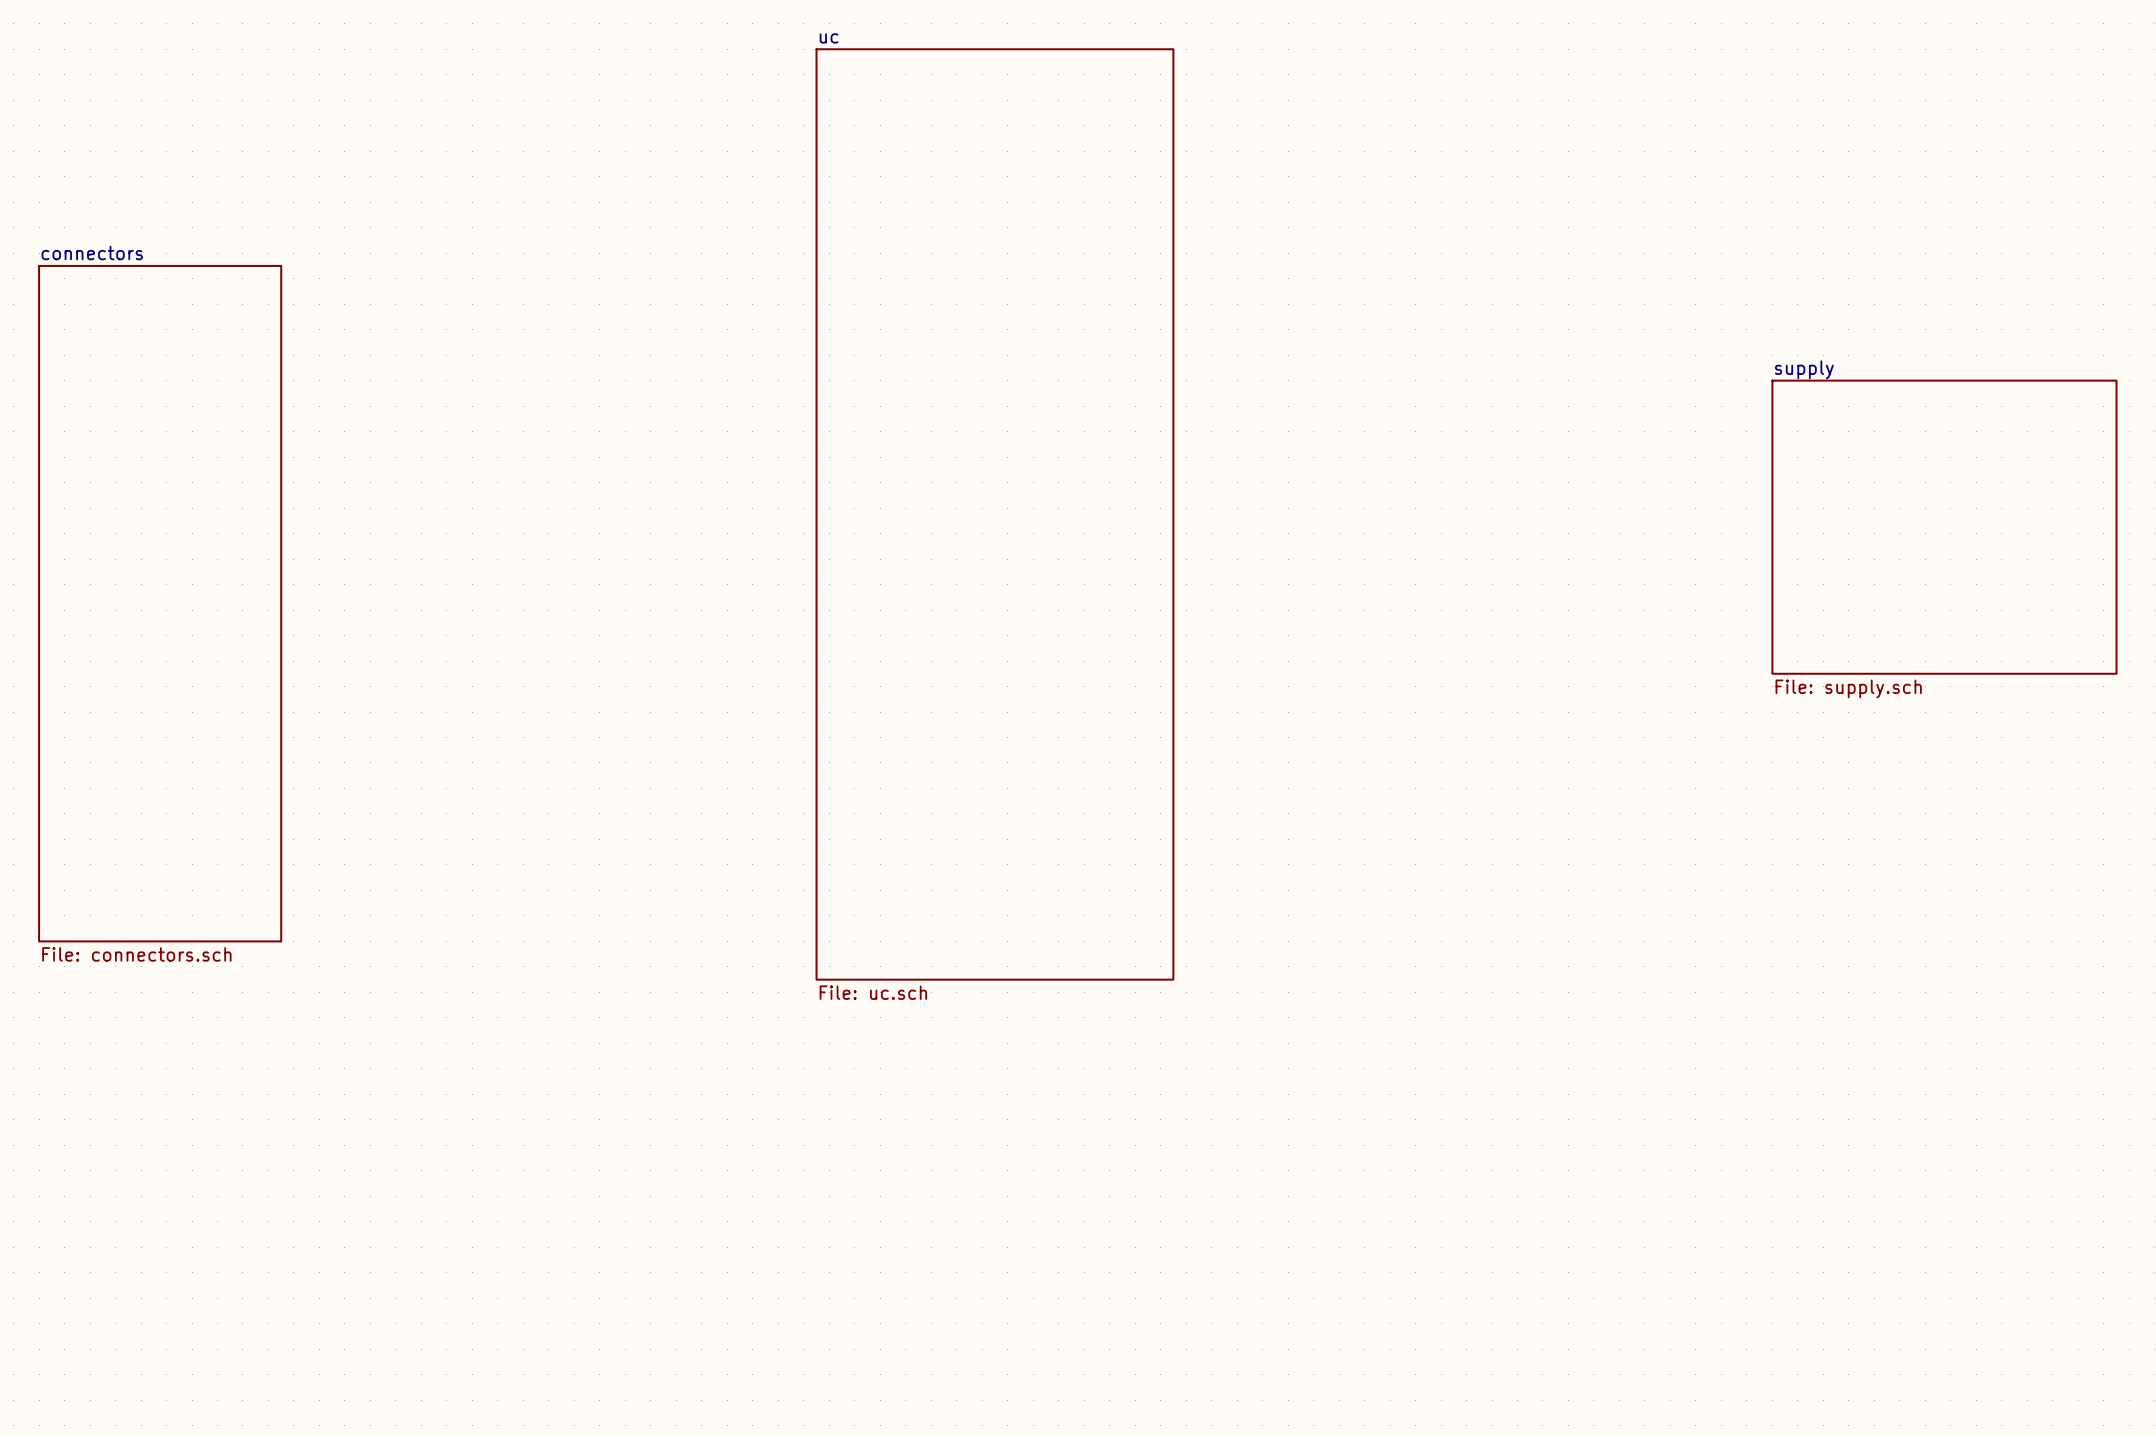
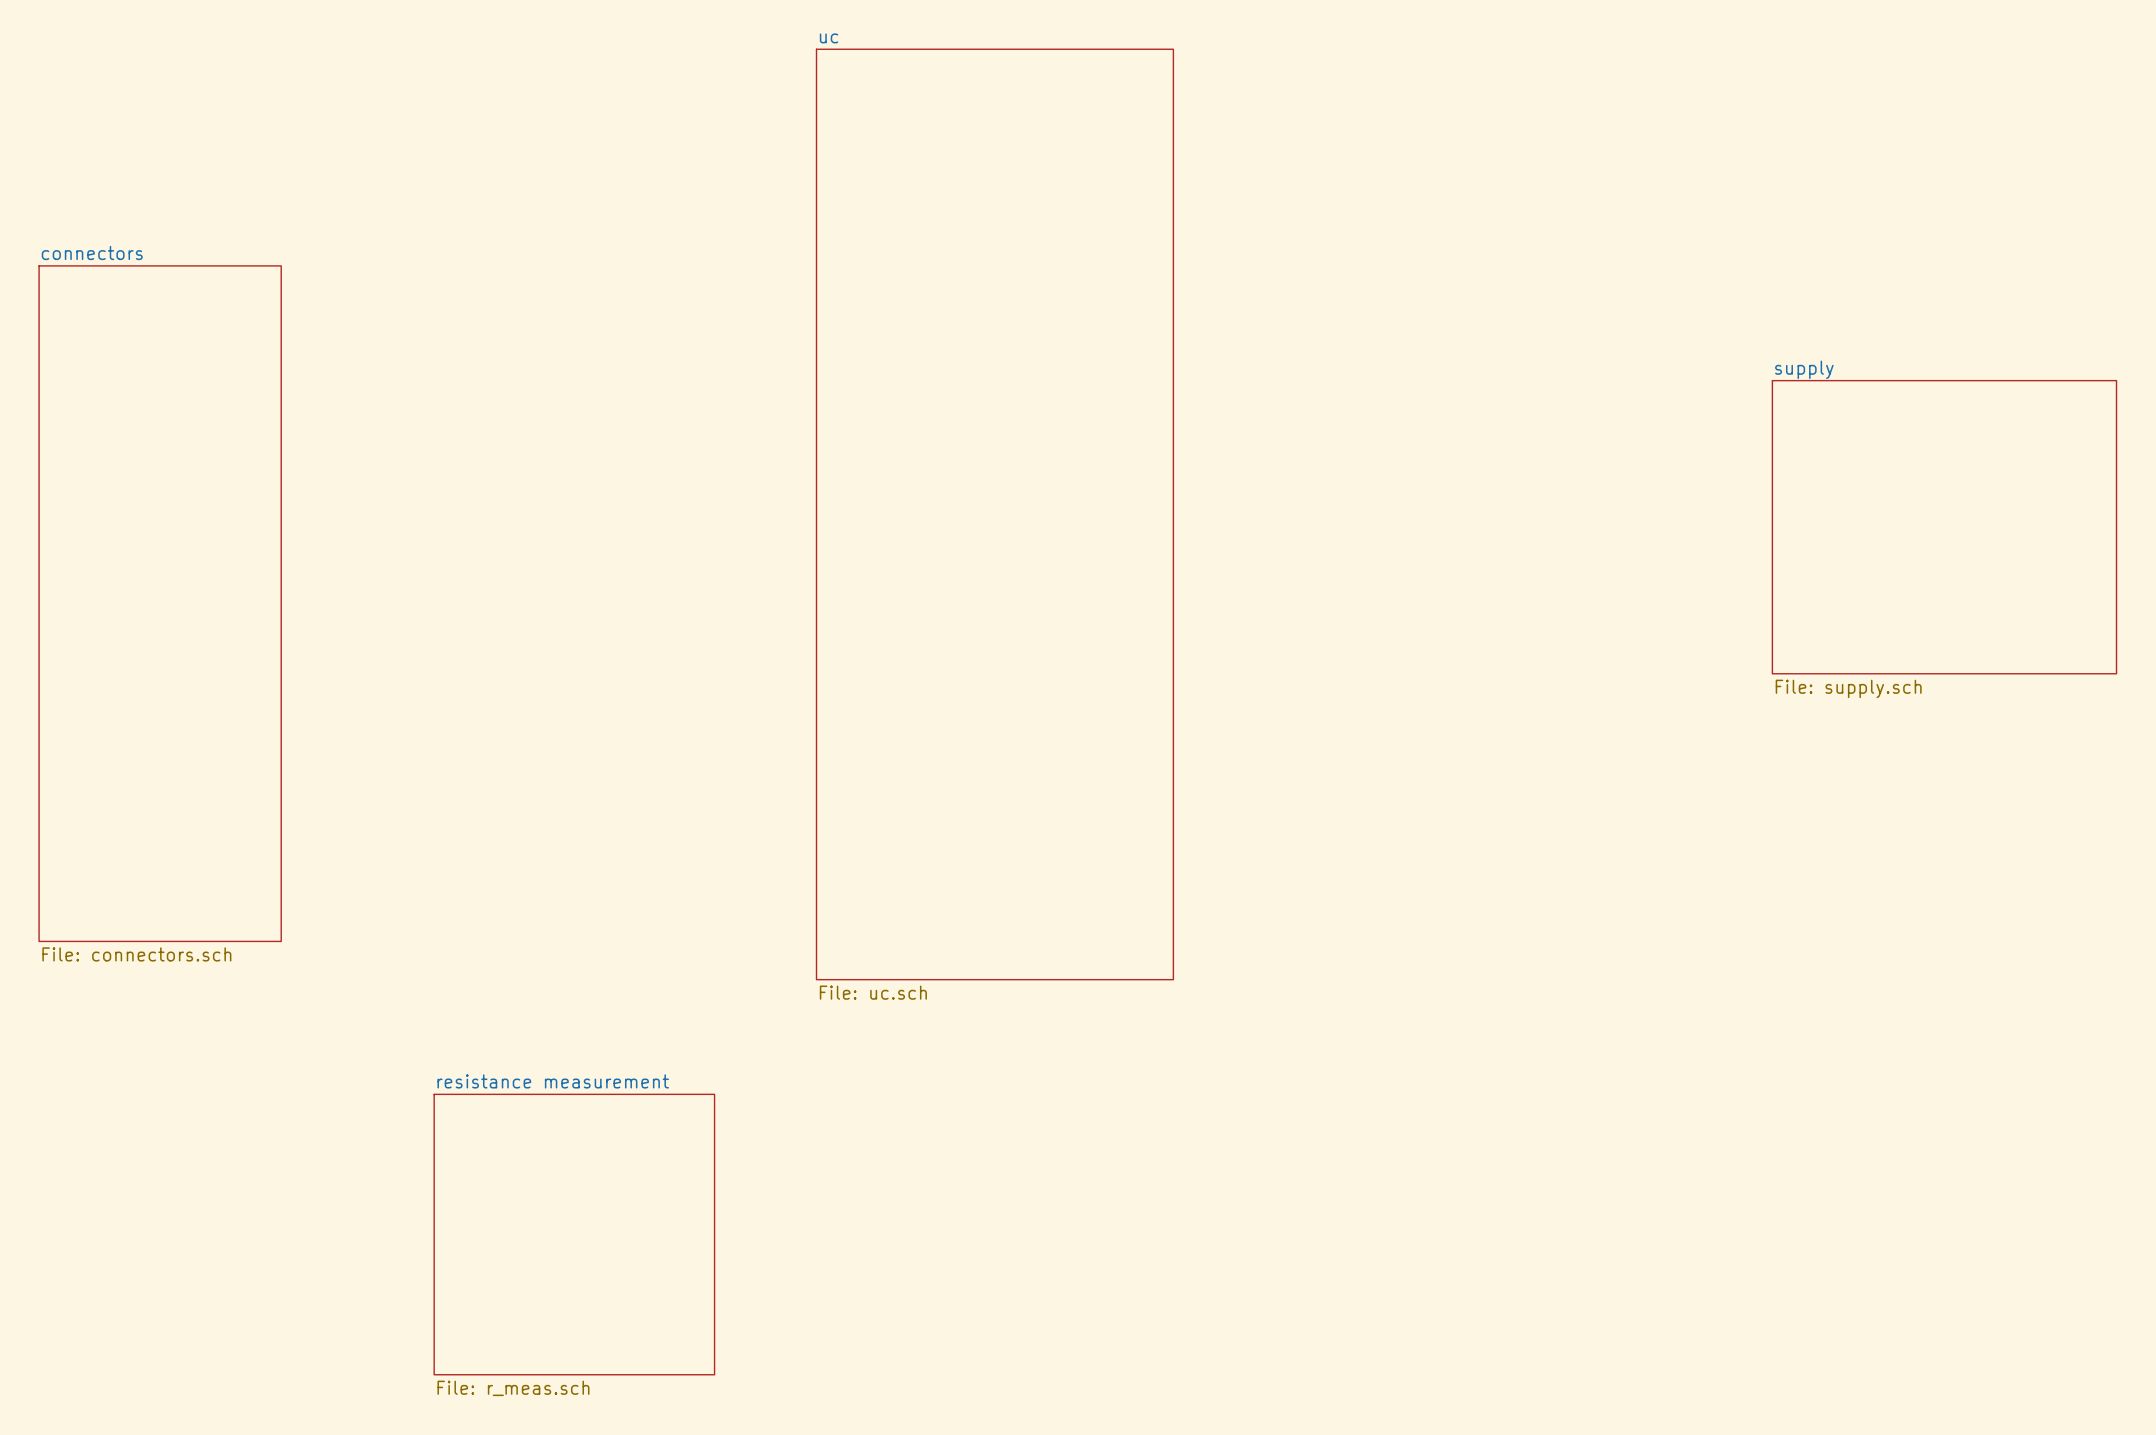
sheet resistance measurement: none -> File: r_meas.sch (574, 1234)

